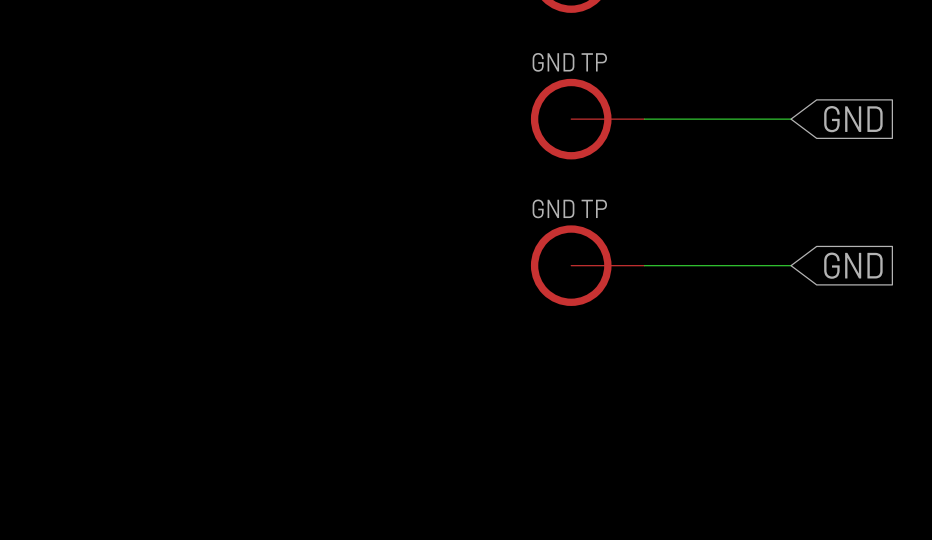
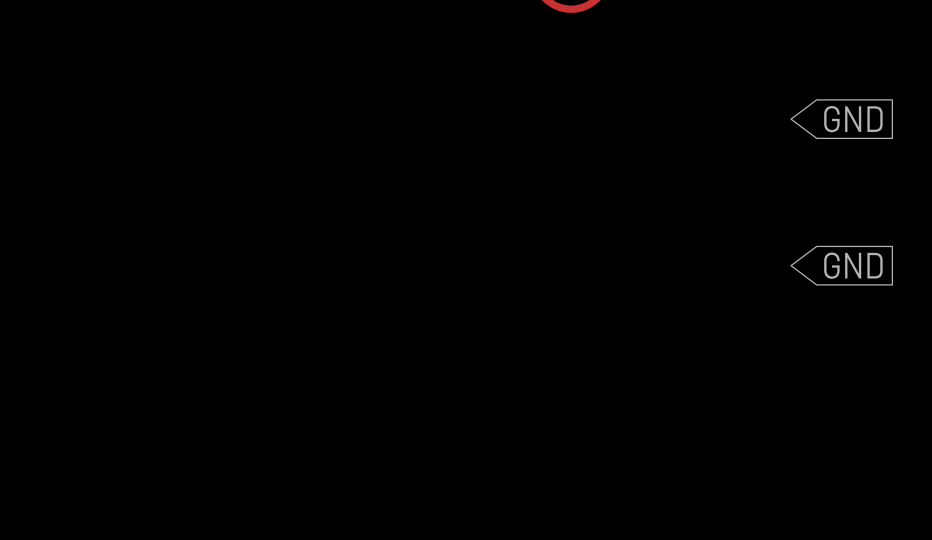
part: (587, 119) -> none
wire: (644, 119) (791, 119) -> none
part: (587, 265) -> none
wire: (644, 265) (791, 265) -> none

